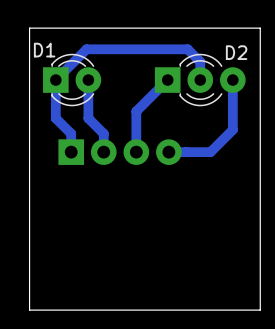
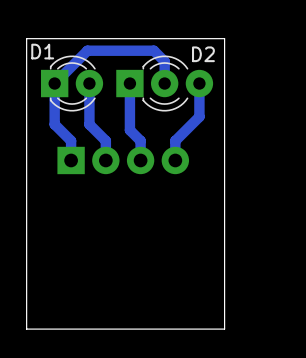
board edge: (29, 38) (29, 28) (260, 28) (260, 310) (215, 310) -> (26, 38) (224, 38) (224, 329)
bottom track: (148, 49) (187, 49) (200, 61) (200, 80) (200, 56) -> (153, 50) (164, 61) (164, 83)
bottom track: (167, 80) (136, 111) (136, 133) -> (129, 83) (129, 130) (140, 140)
D2 position: (200, 80) -> (164, 83)
bottom track: (234, 86) (232, 80) (232, 129) (210, 152) (168, 152) -> (199, 83) (199, 116) (175, 140) (175, 160)

